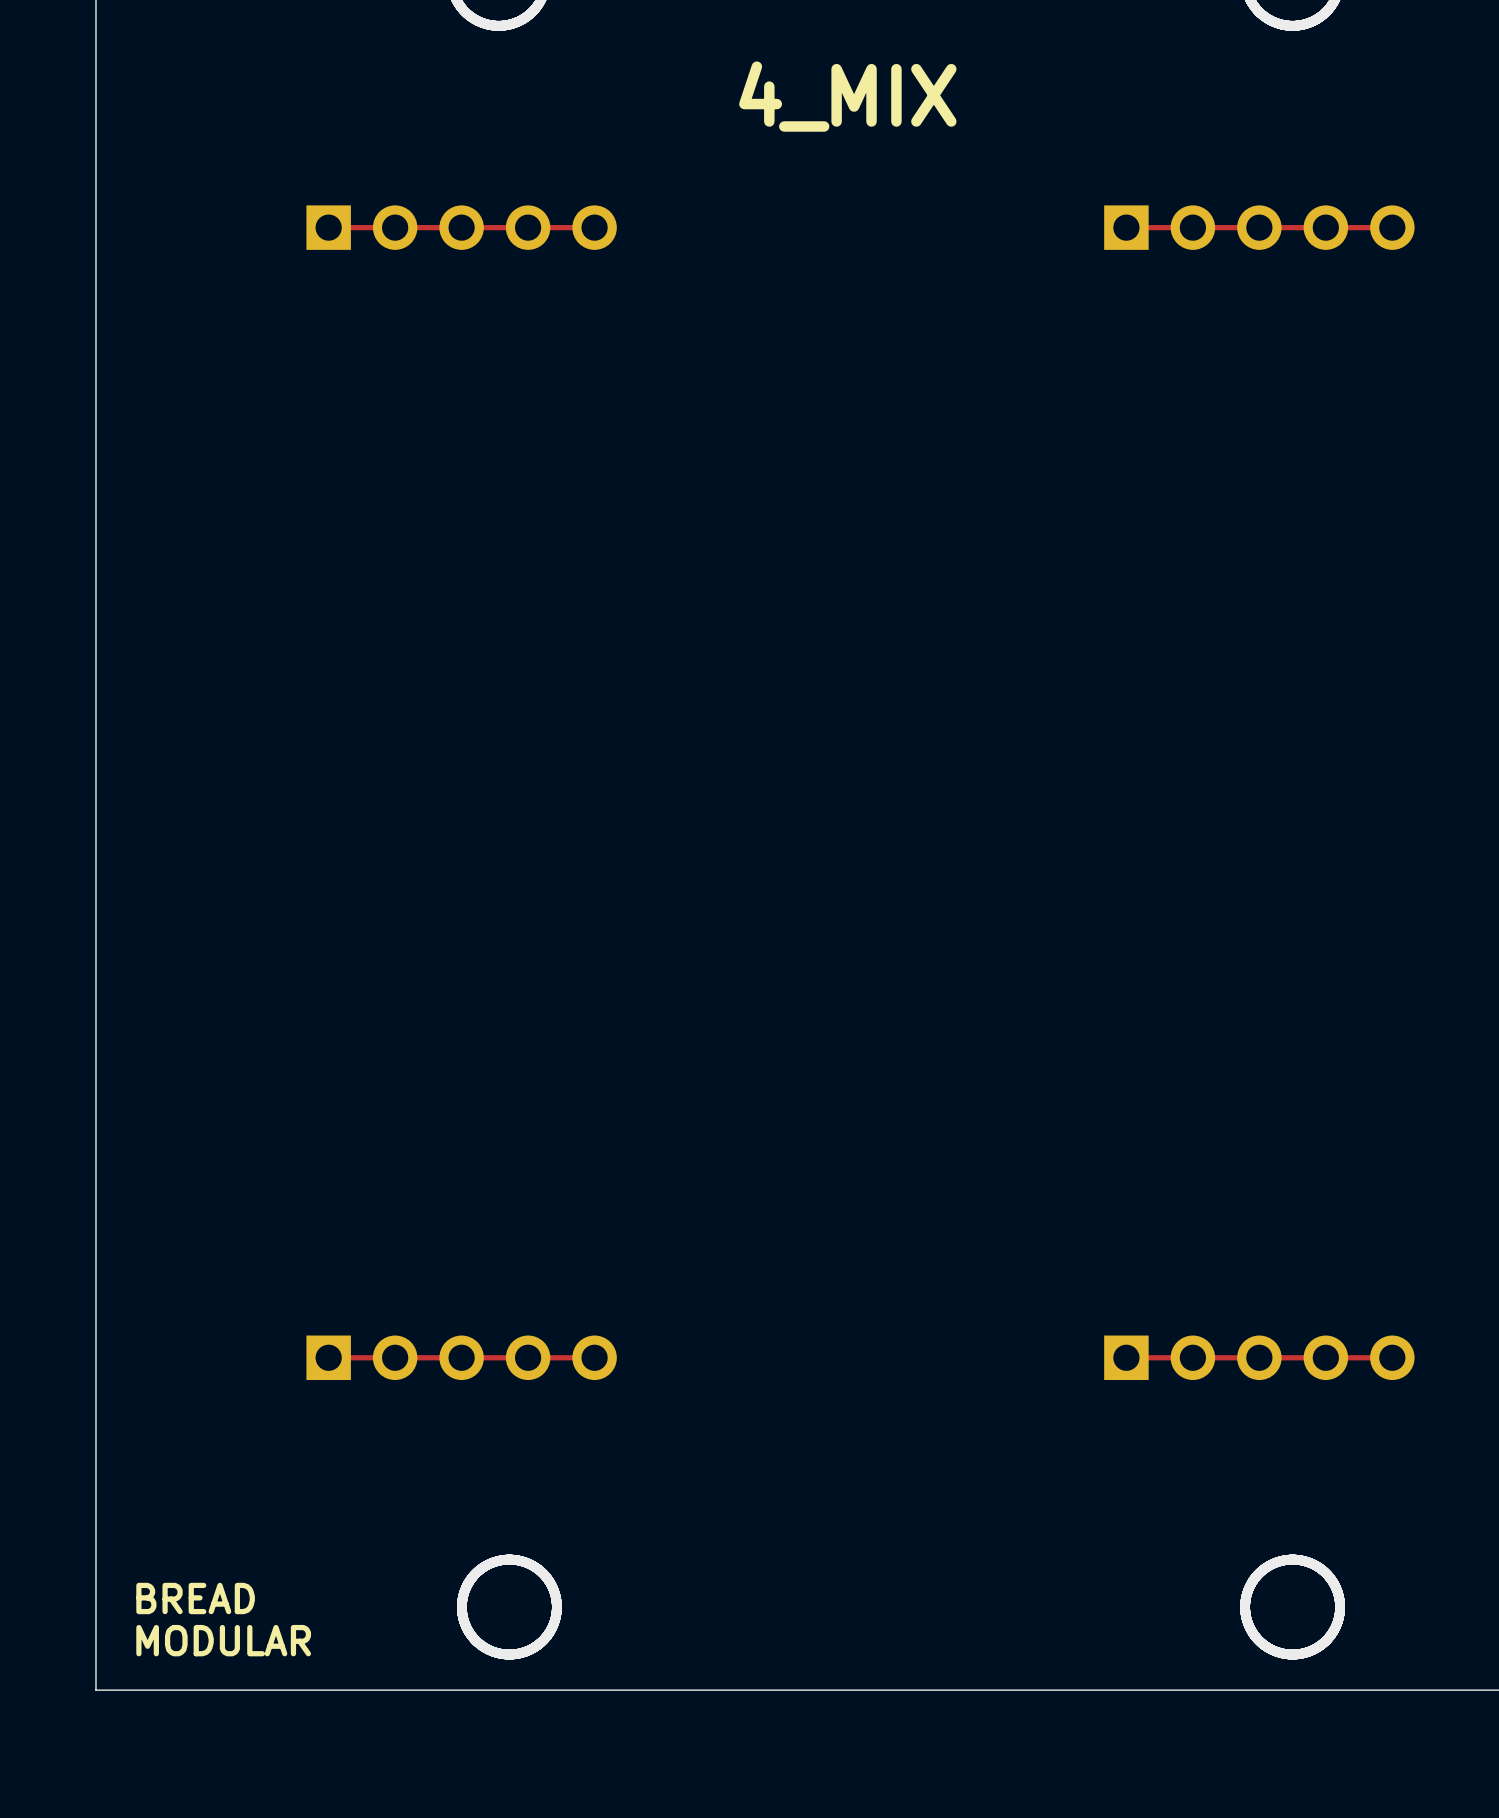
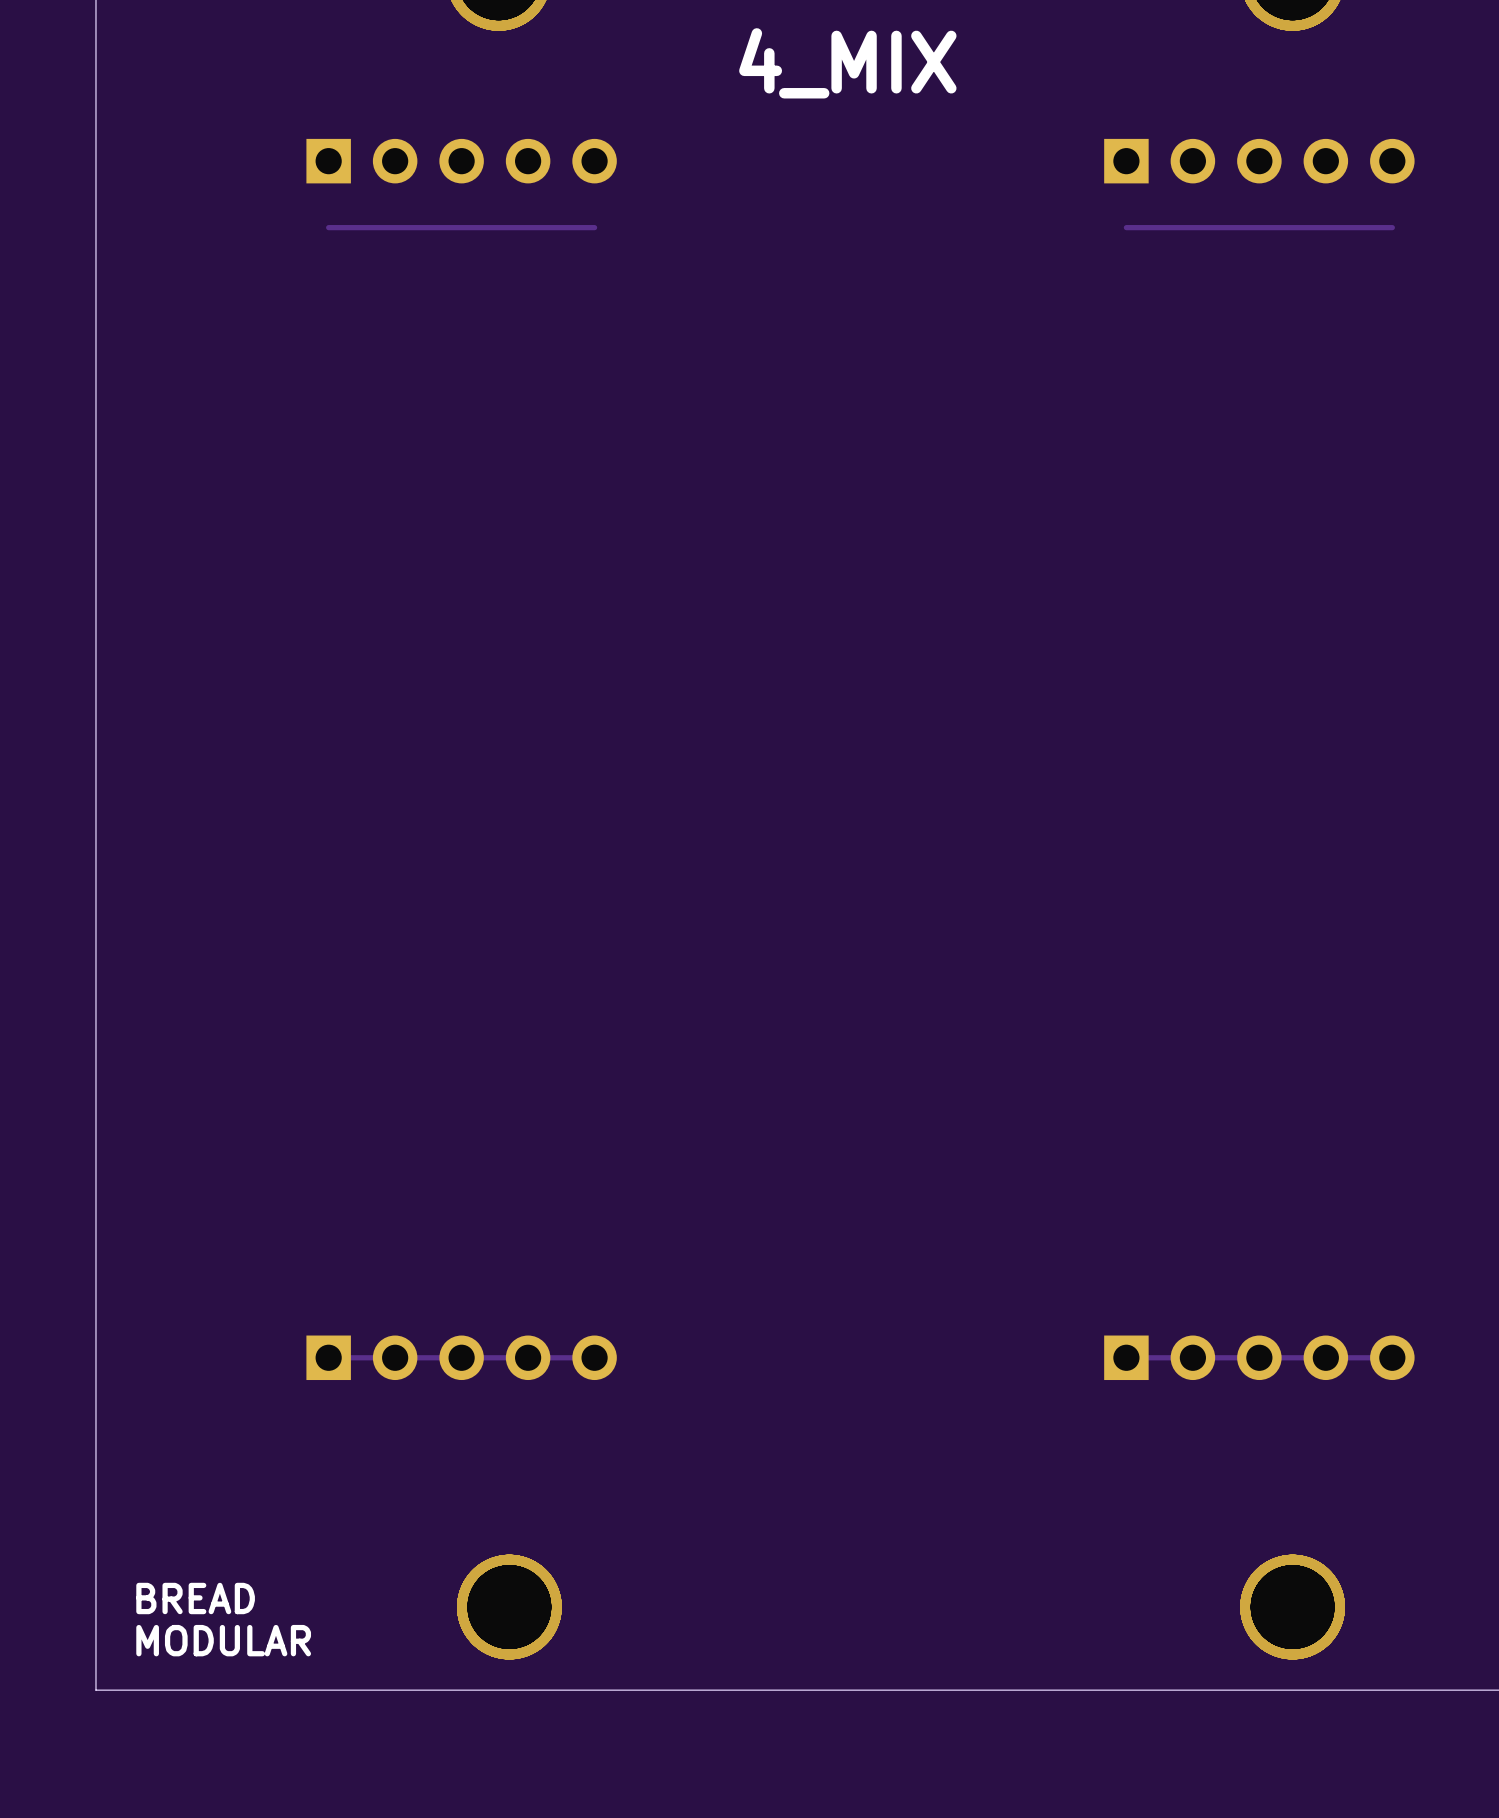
text position: 4_MIX (847, 96) -> 4_MIX (847, 63)
part position: (461, 227) -> (461, 161)
part position: (1259, 227) -> (1259, 161)

